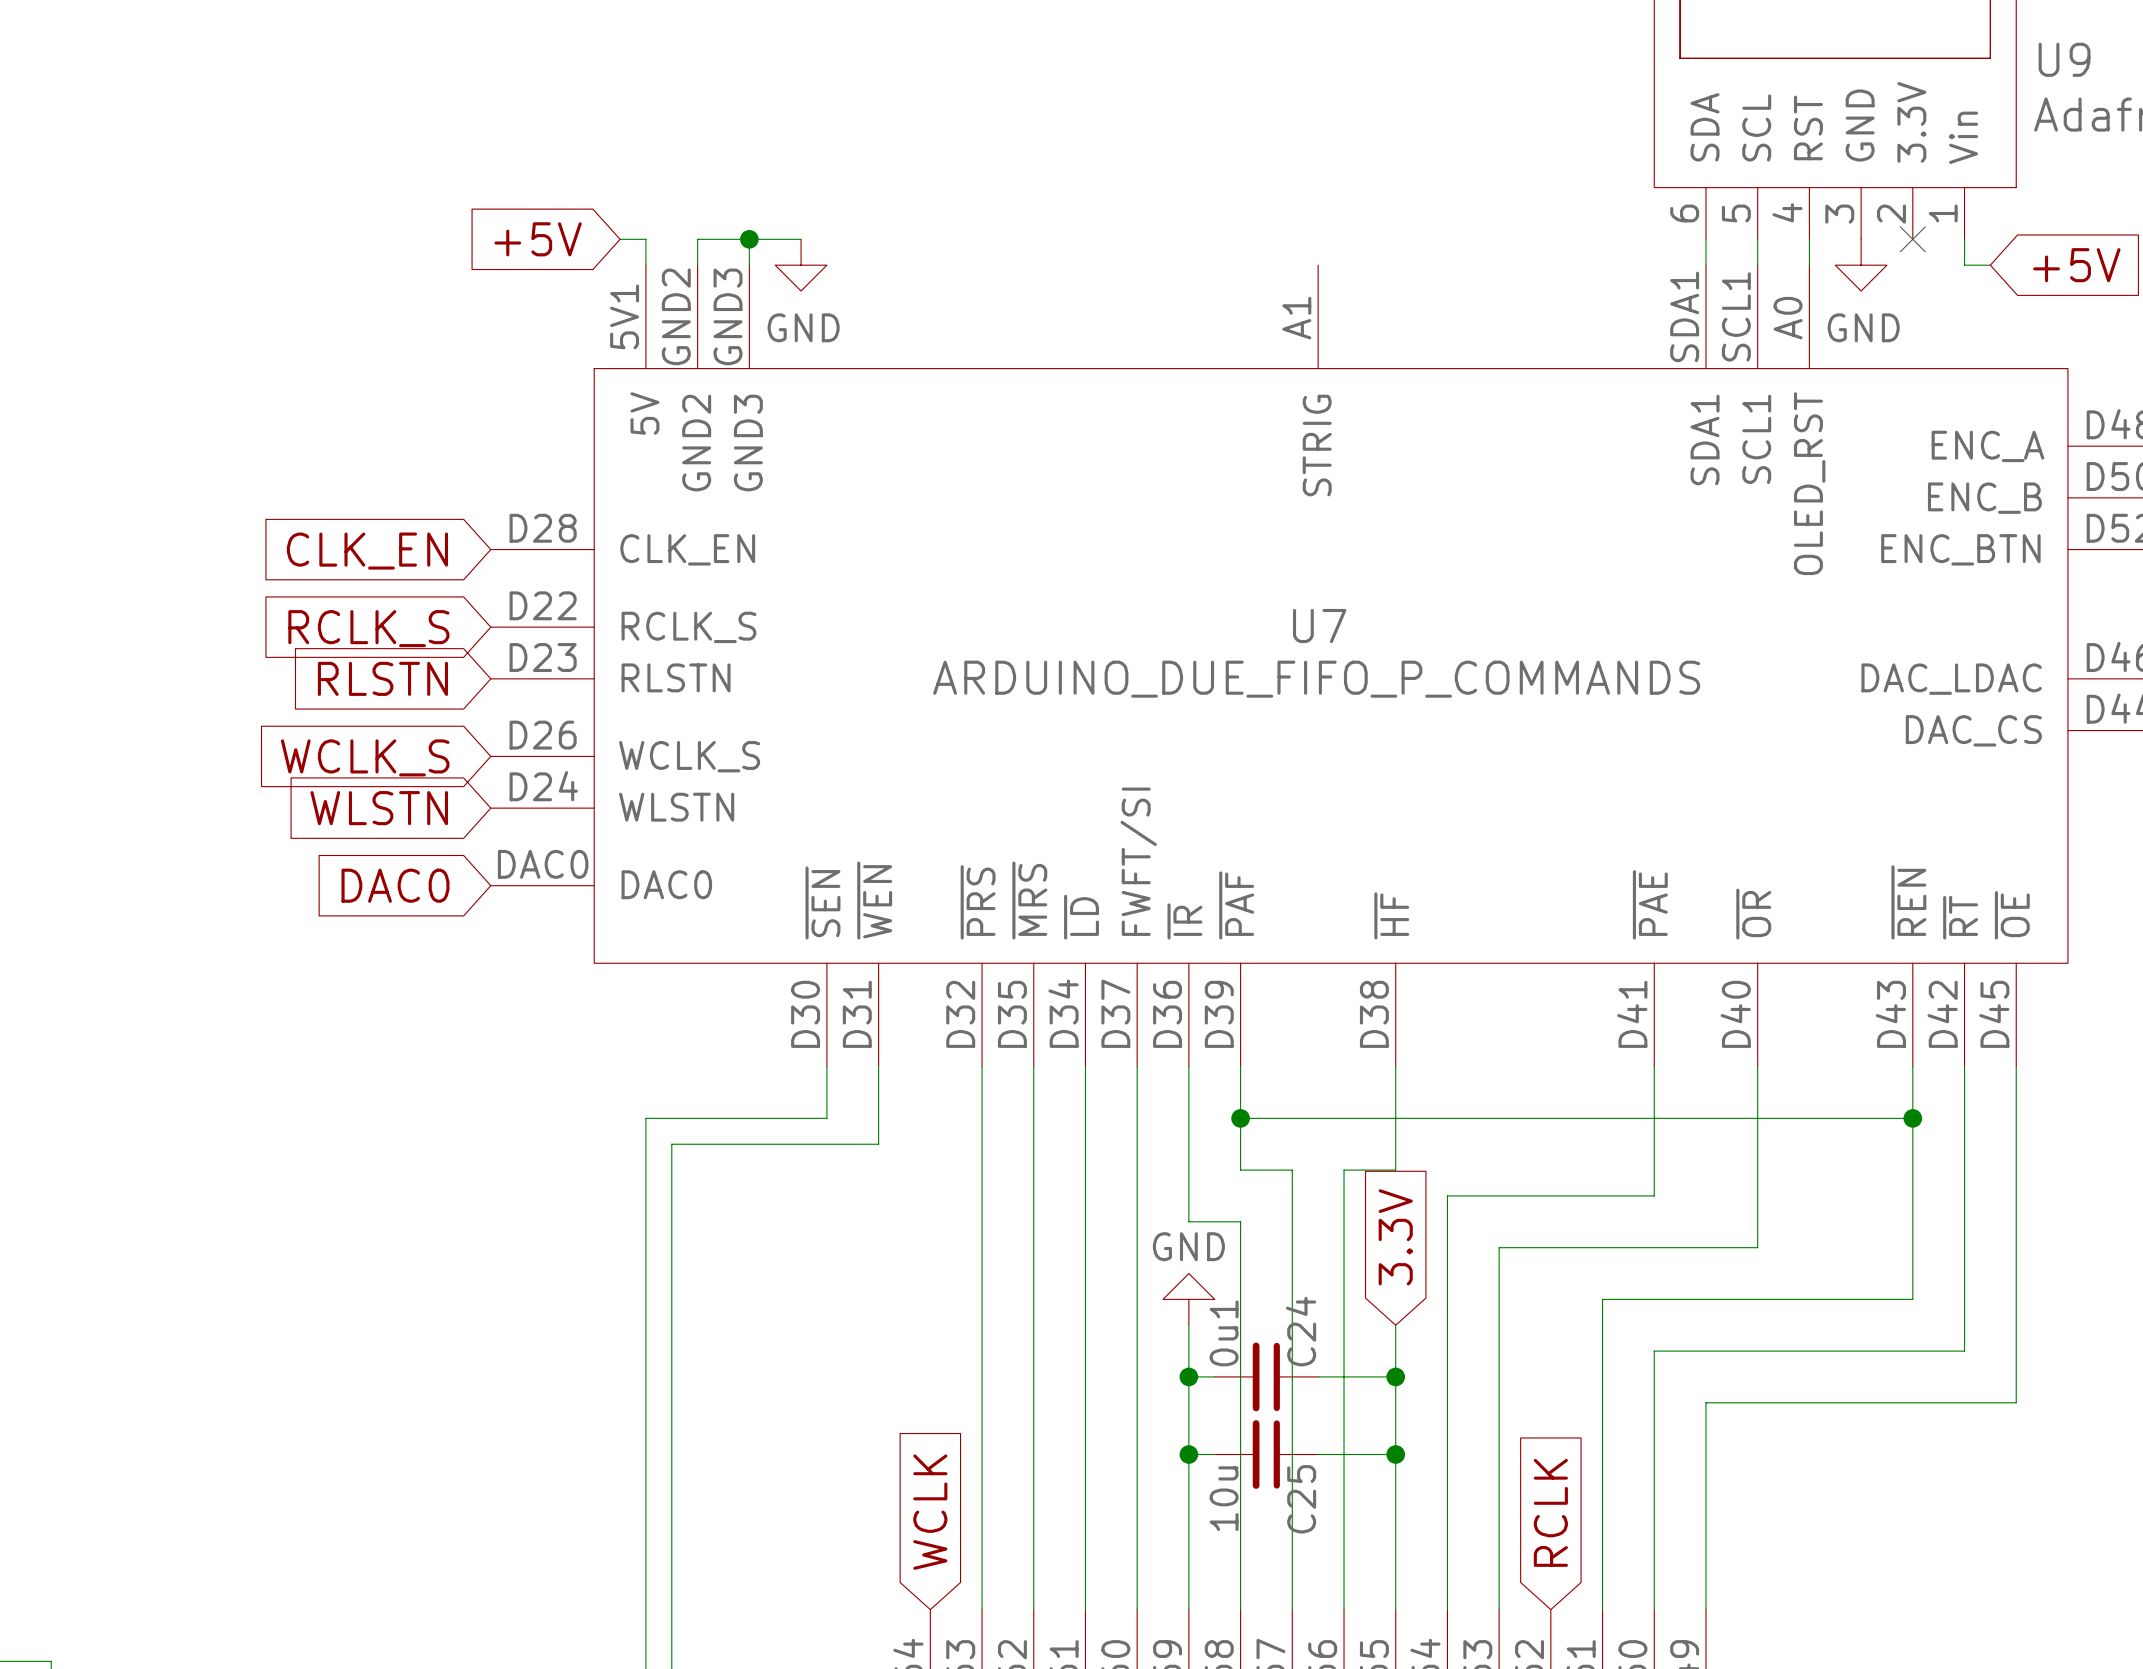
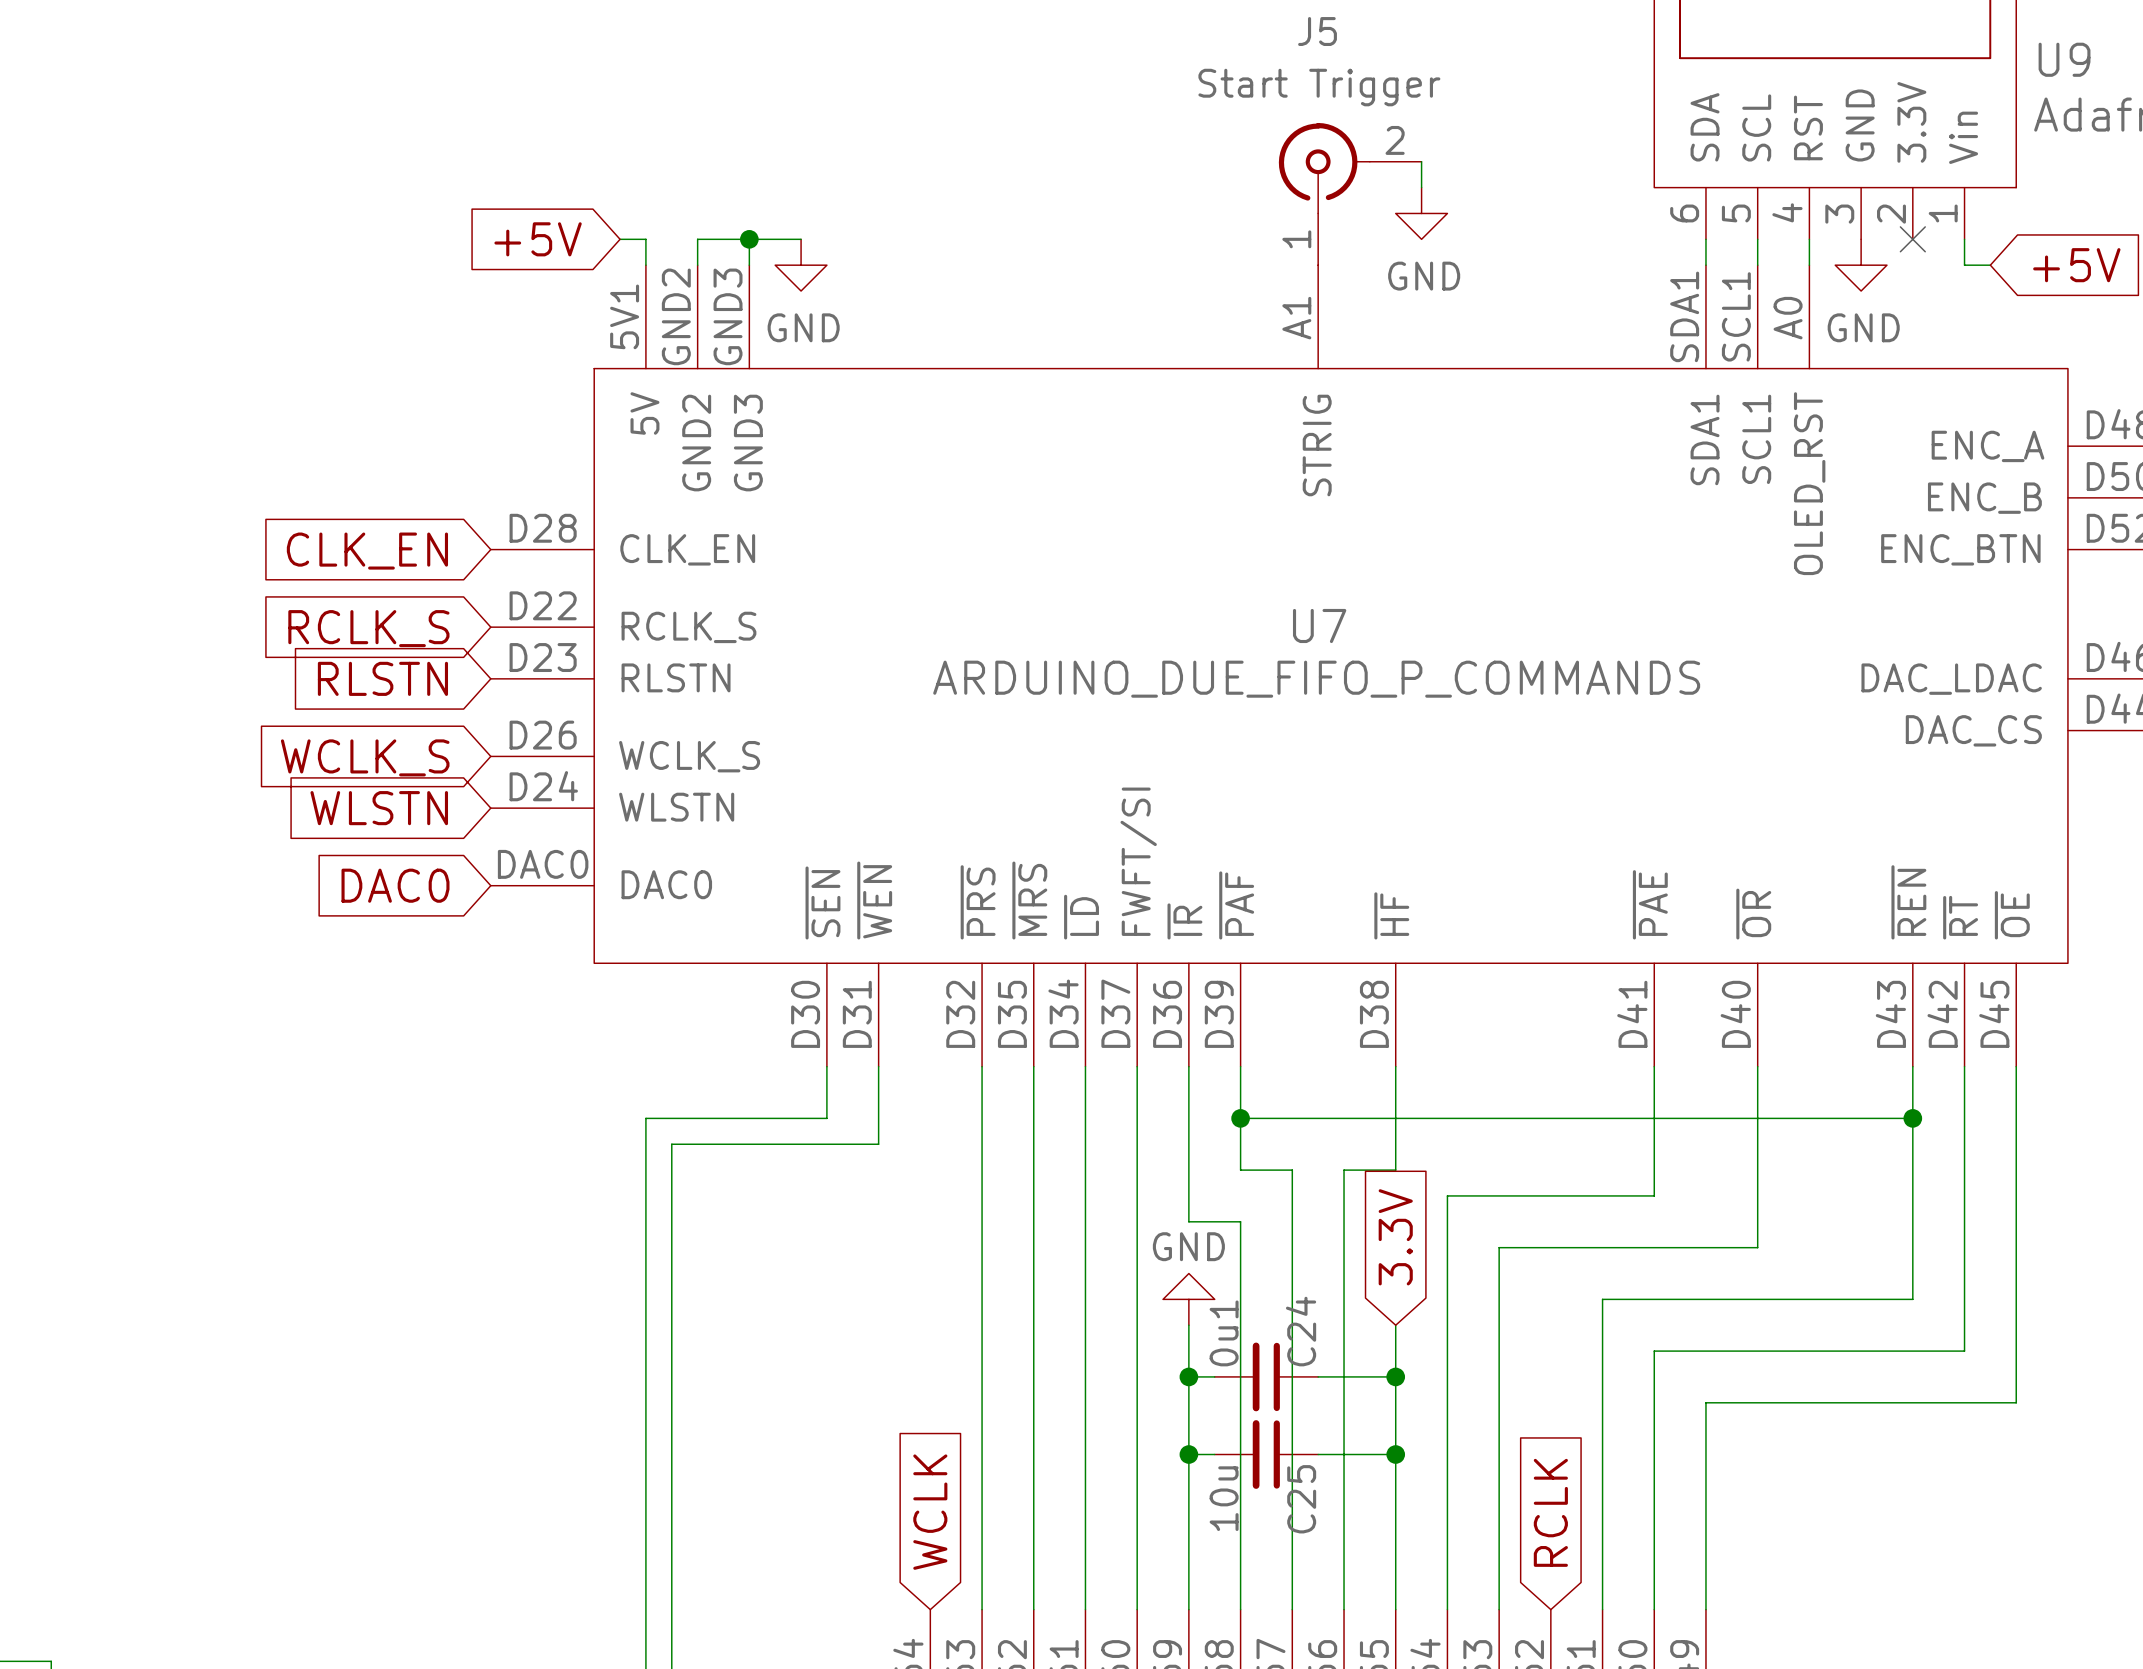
wire: none -> (1421, 161) (1421, 187)
J5: none -> Start Trigger (1350, 194)
power symbol: none -> GND (1421, 213)

